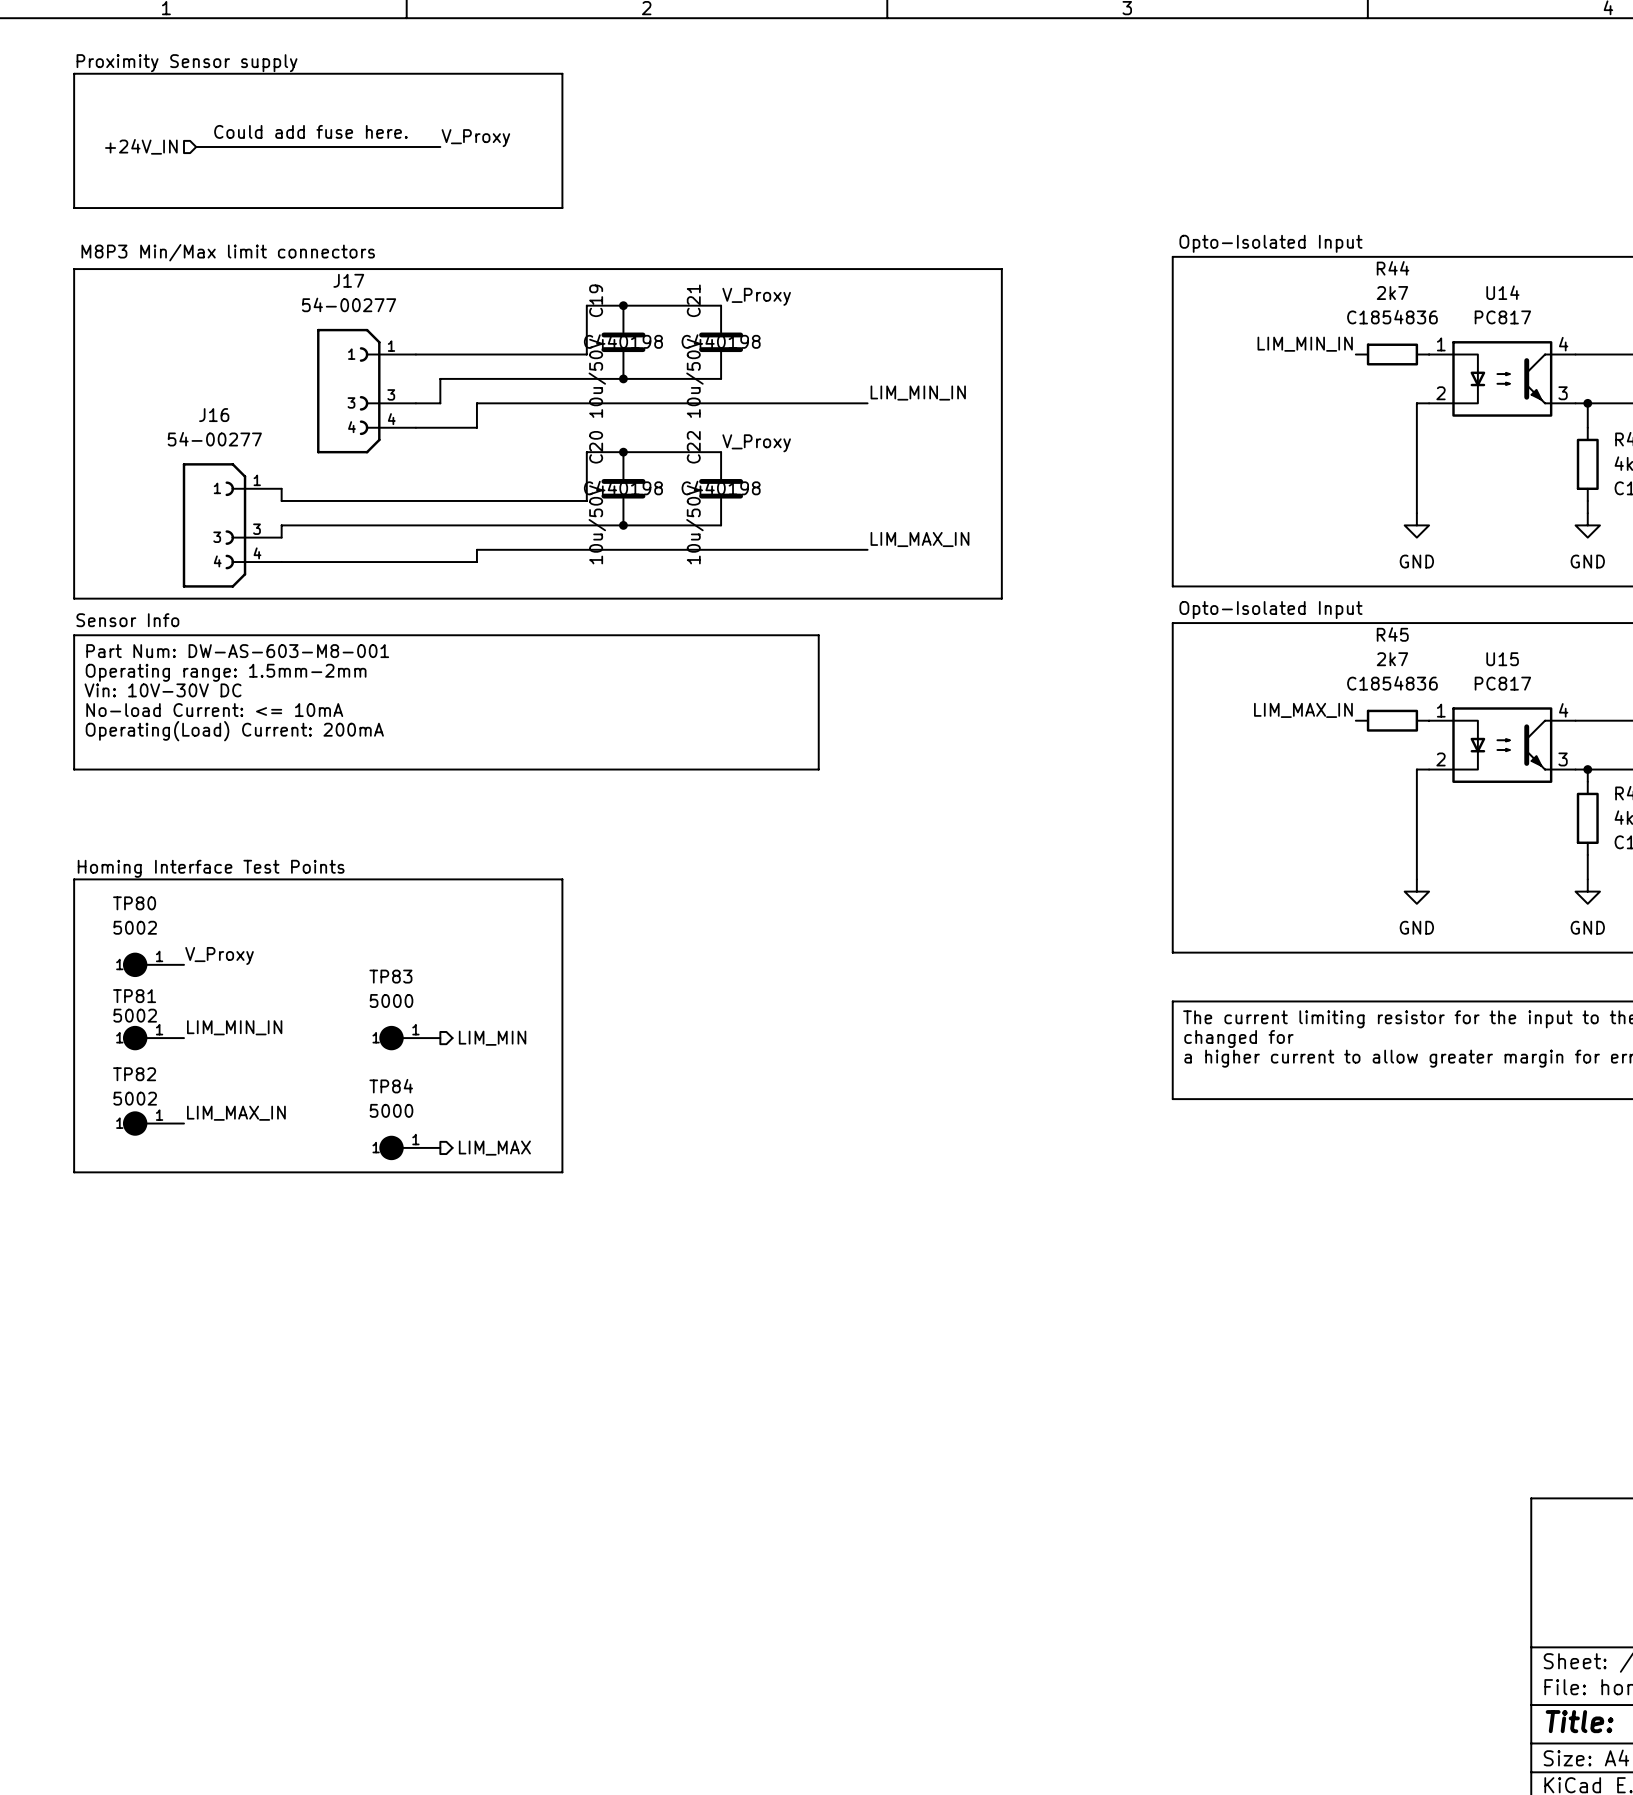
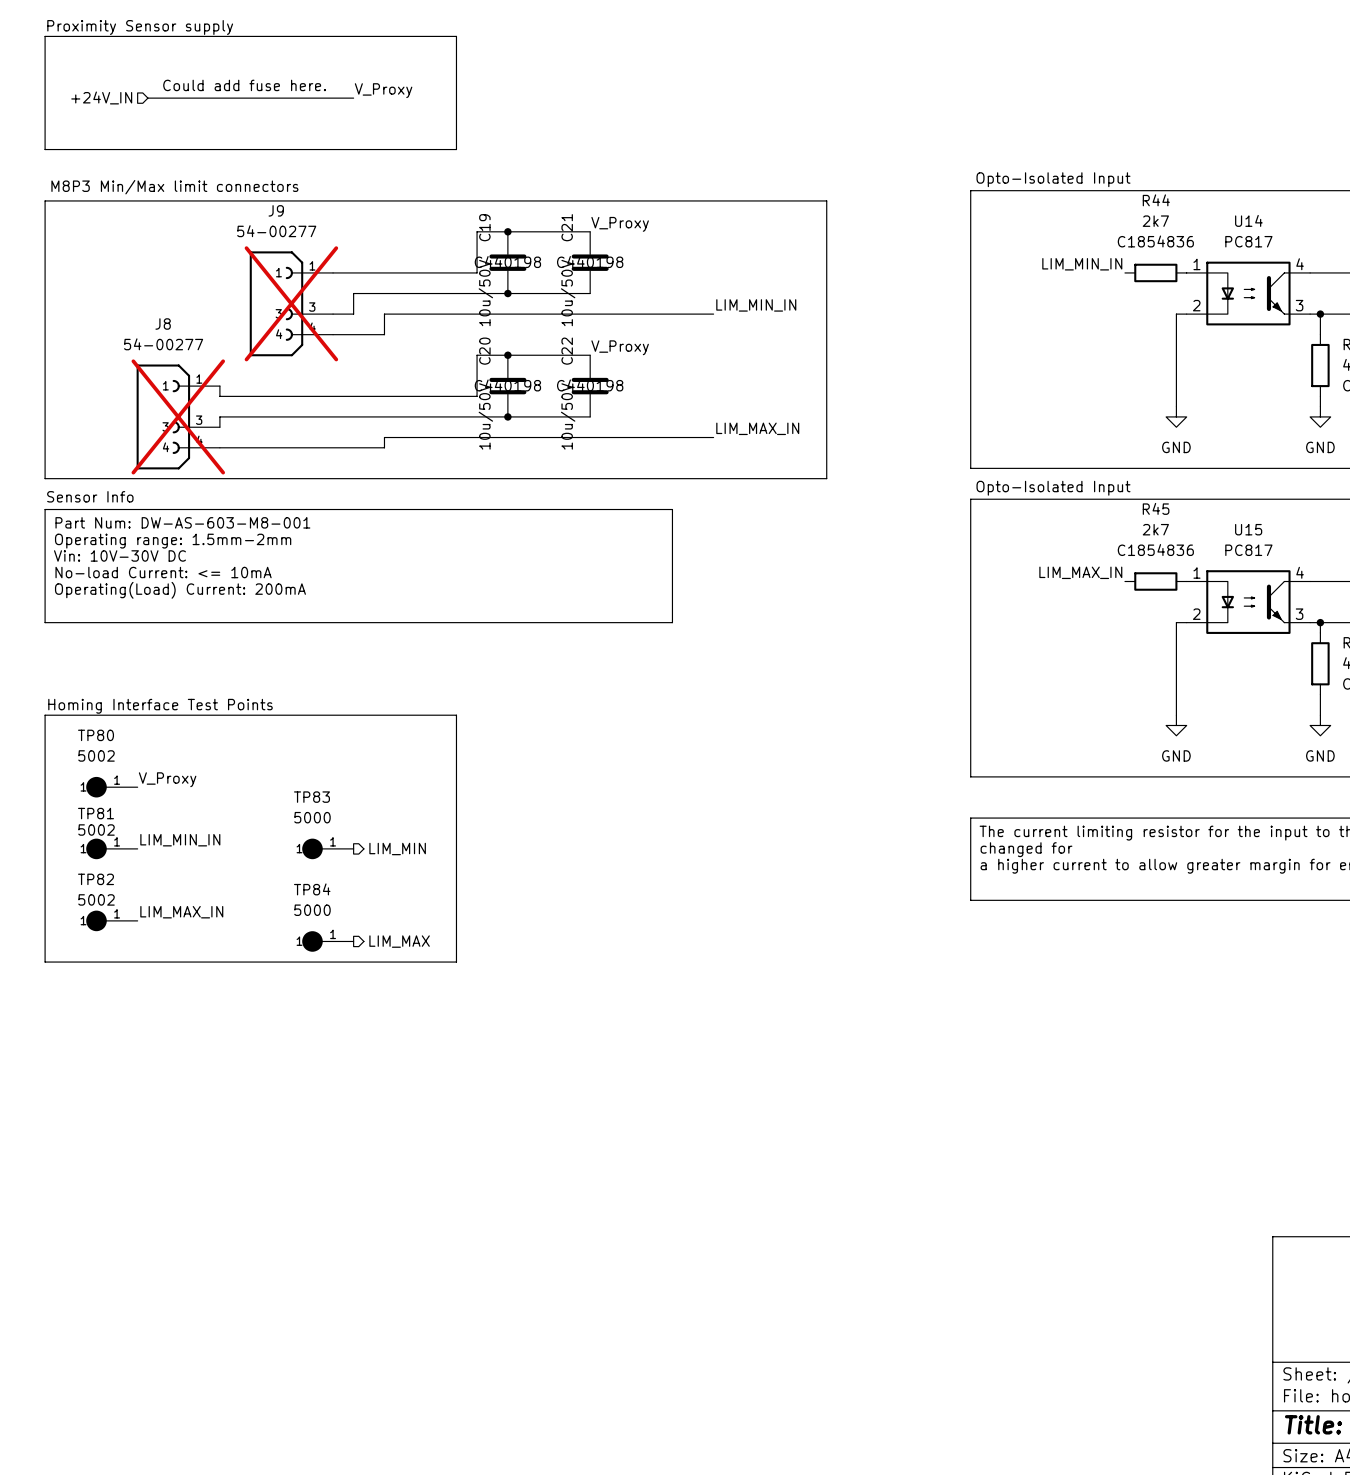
J17 name: J17 (348, 280) -> J9 (276, 210)
J17 do-not-place cross: none -> (291, 303)
J16 name: J16 (214, 415) -> J8 (163, 324)
J16 do-not-place cross: none -> (178, 416)

